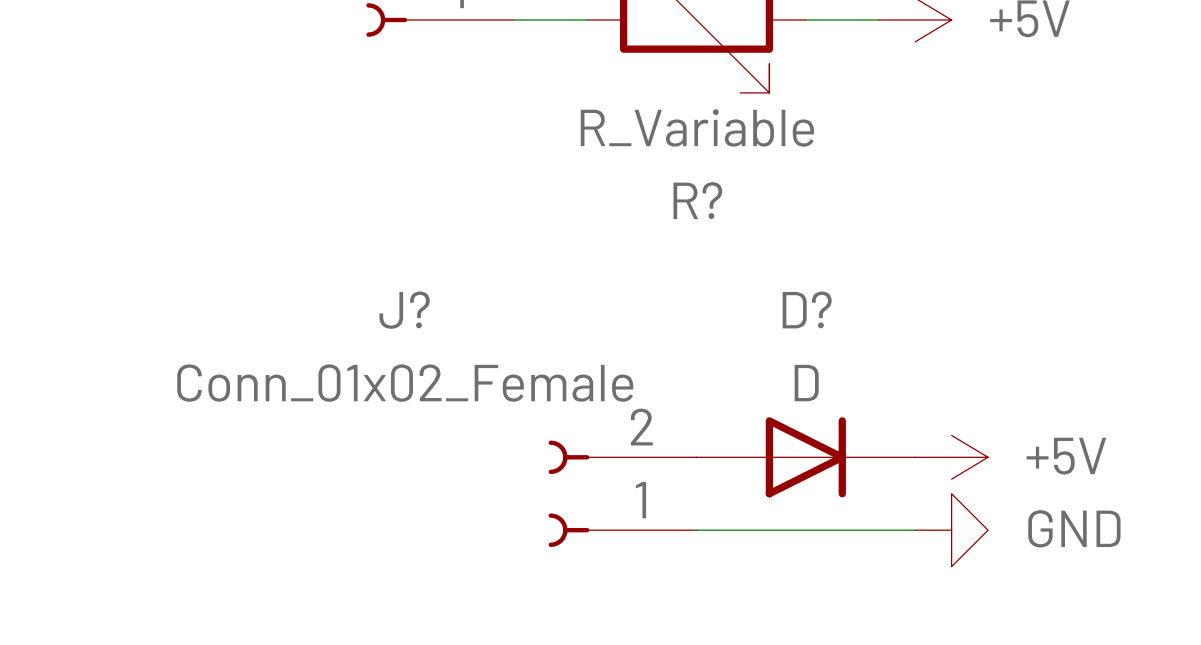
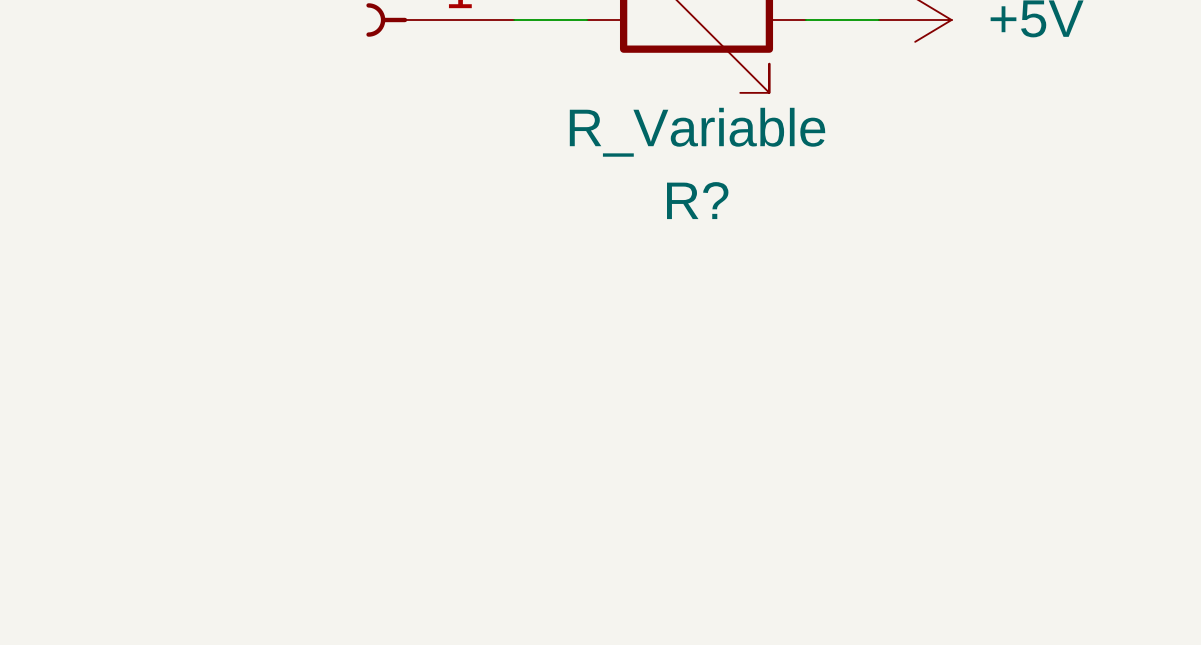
D?: D (805, 457) -> none
power symbol: +5V (951, 457) -> none
J?: Conn_01x02_Female (622, 493) -> none
wire: (696, 530) (915, 530) -> none
power symbol: GND (951, 530) -> none

